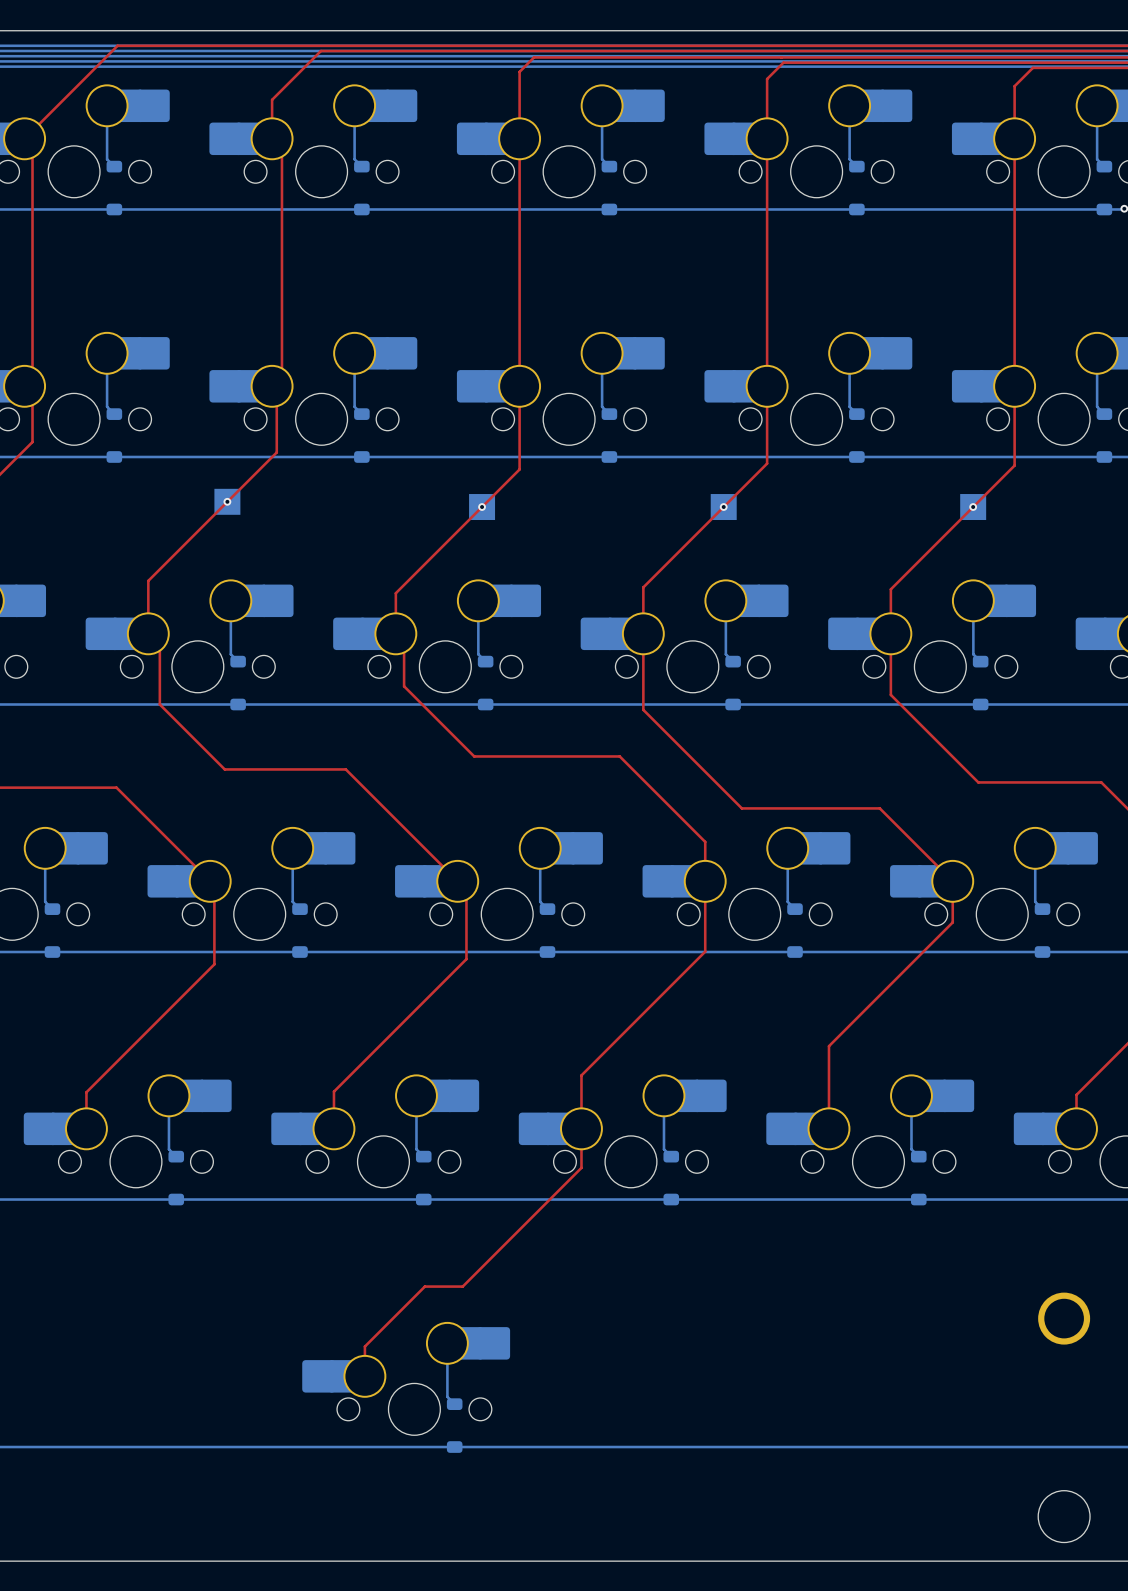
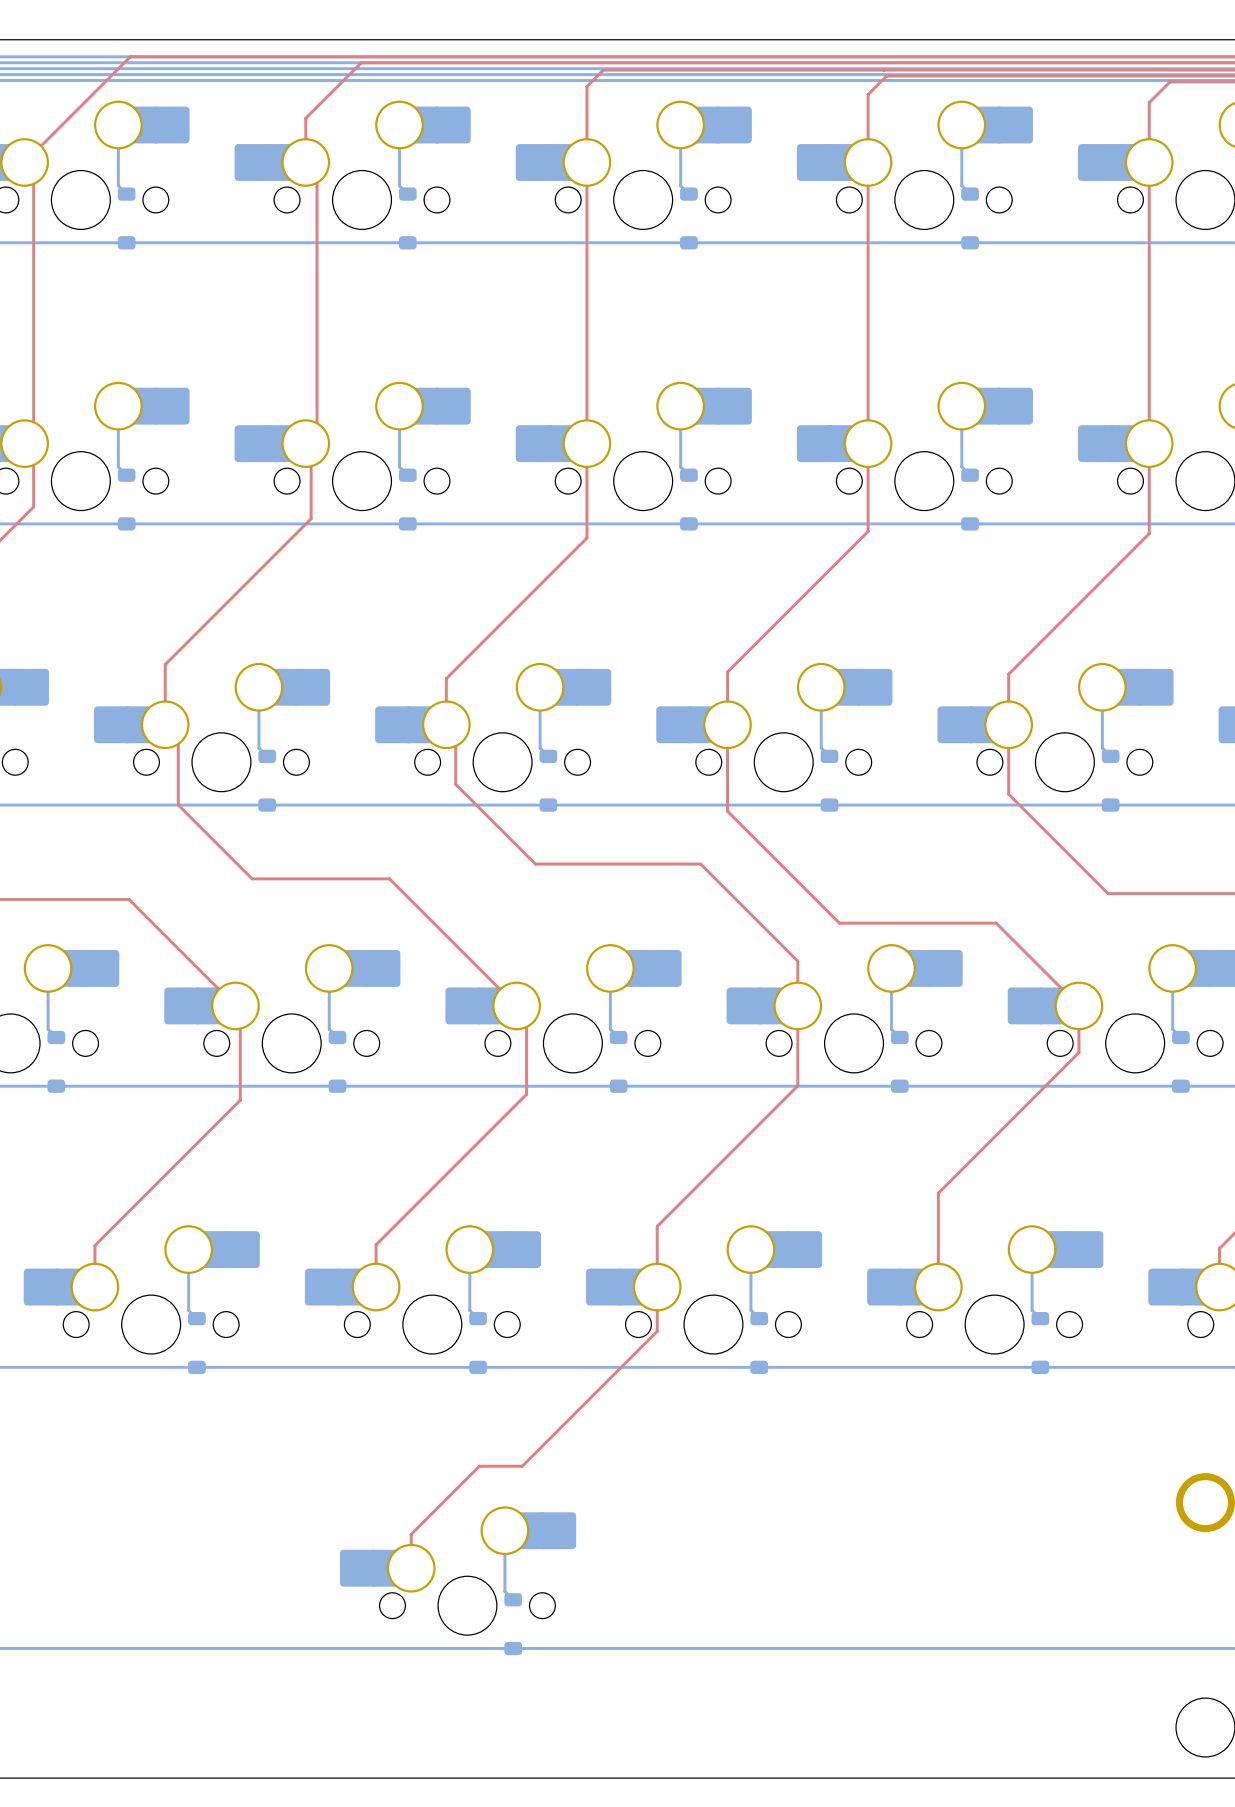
part: (227, 501) -> none
via: (227, 501) -> none
part: (482, 507) -> none
via: (482, 507) -> none
part: (723, 507) -> none
via: (723, 507) -> none
part: (973, 507) -> none
via: (973, 507) -> none

